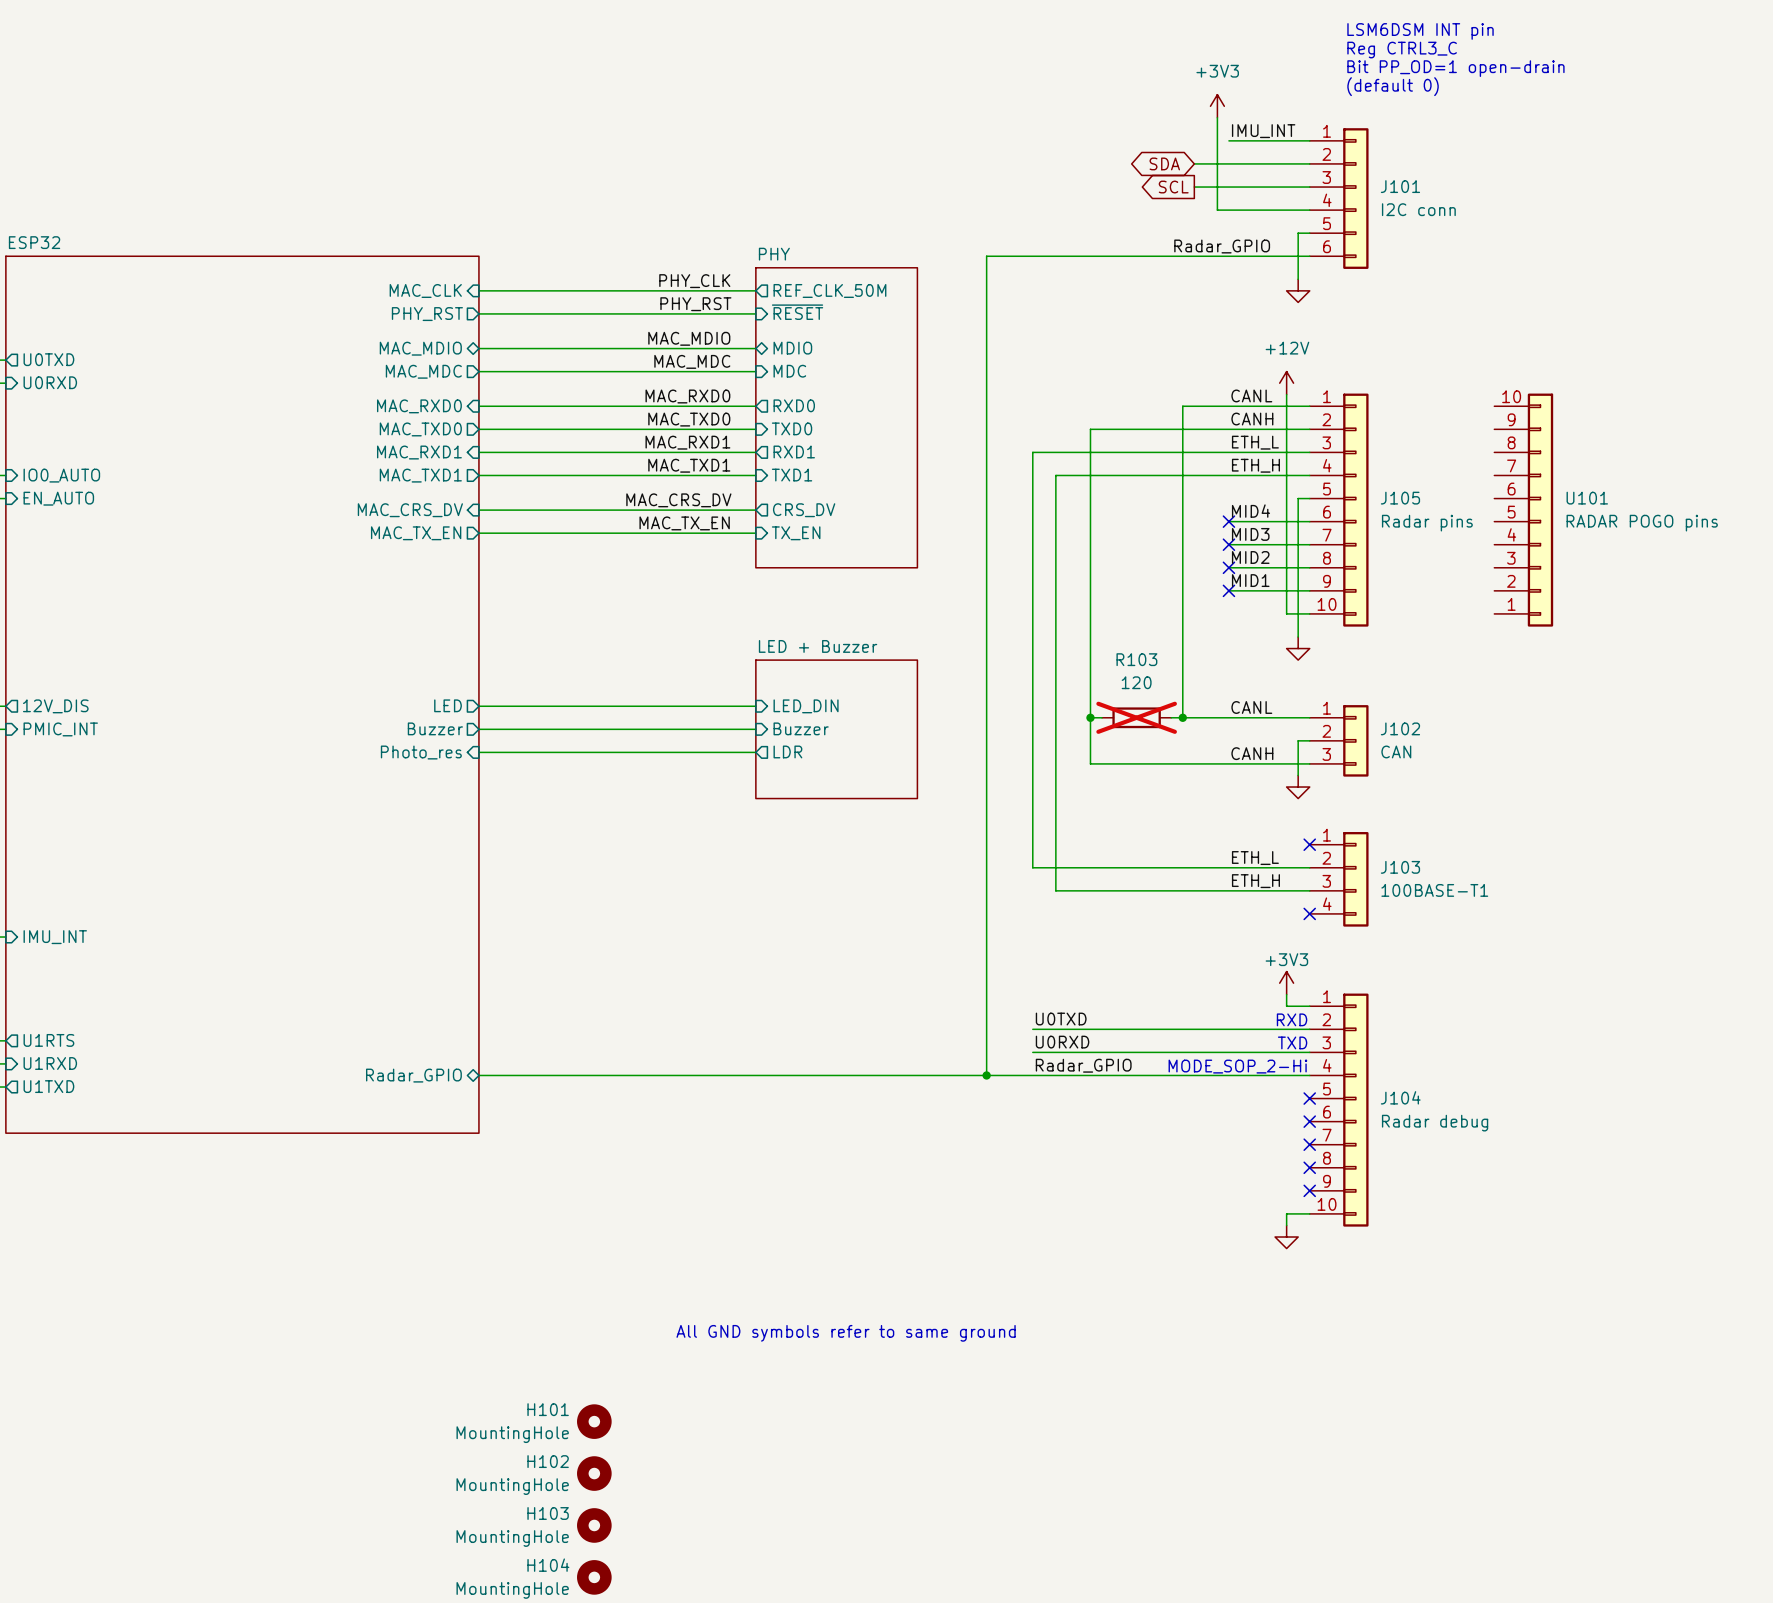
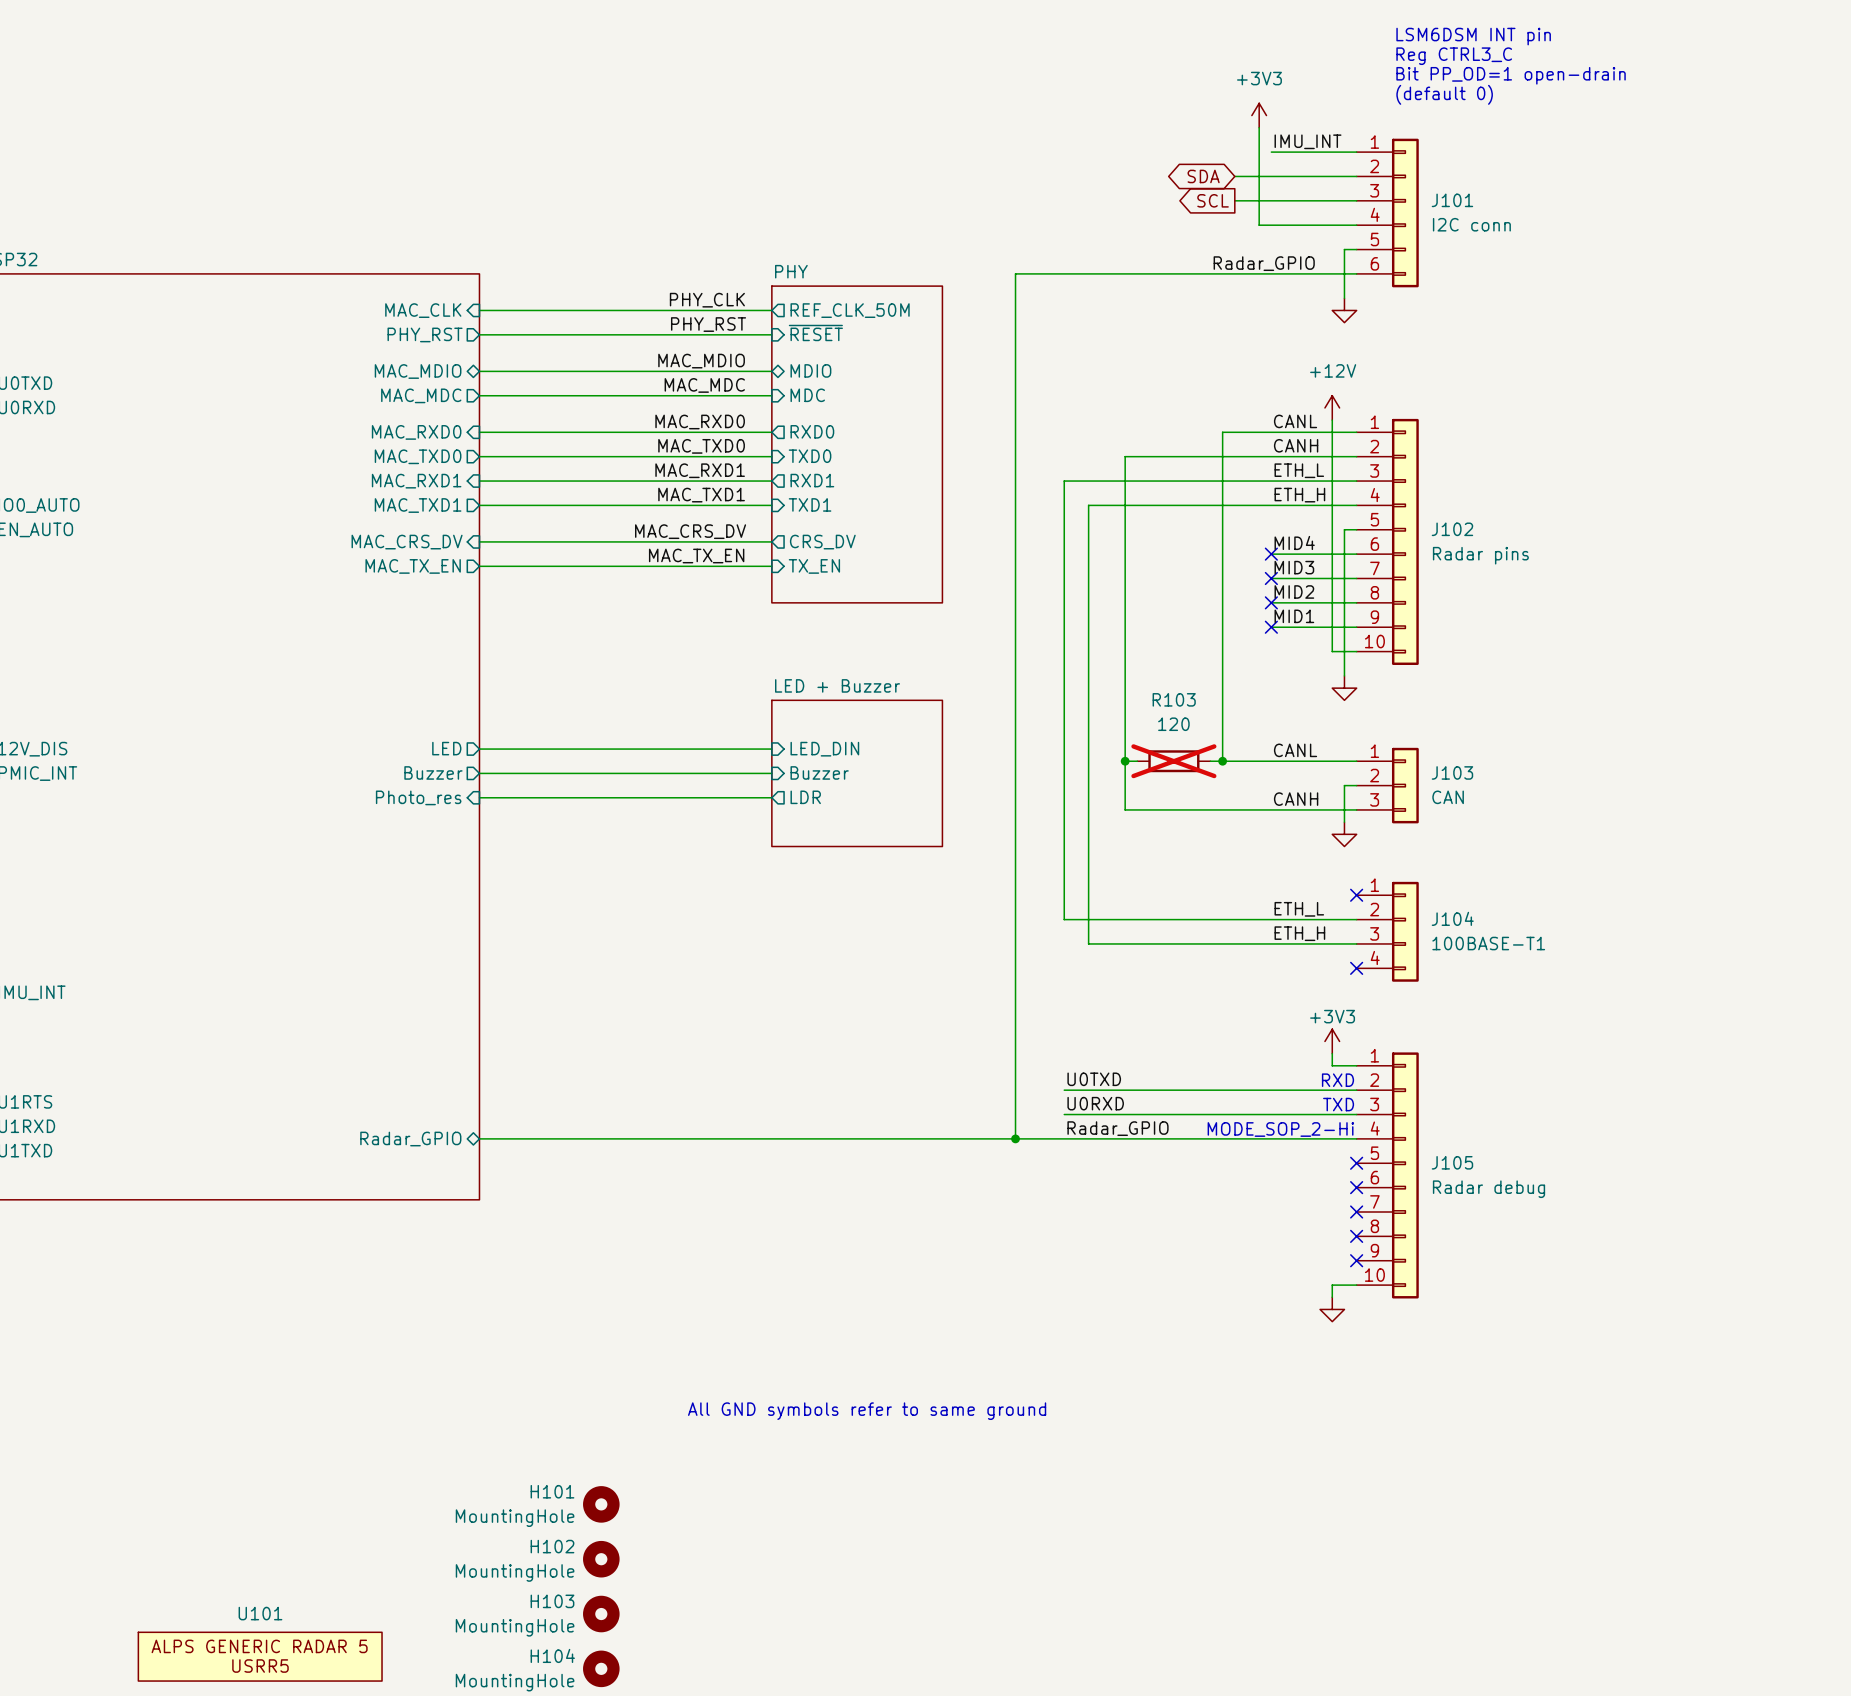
U101 symbol: [1494, 393, 1554, 627] -> [138, 1632, 383, 1682]
J105 name: J105 (1400, 498) -> J102 (1452, 529)
U101 name position: U101 (1587, 498) -> U101 (260, 1613)
U101 value: RADAR POGO pins (1642, 523) -> none
J102 name: J102 (1400, 728) -> J103 (1452, 772)
J103 name: J103 (1400, 867) -> J104 (1452, 918)
J104 name: J104 (1400, 1097) -> J105 (1452, 1162)

